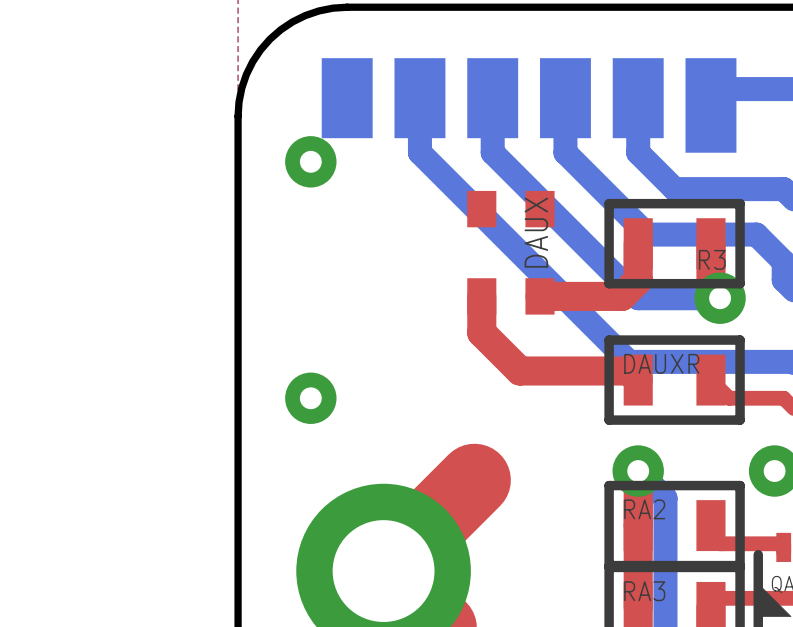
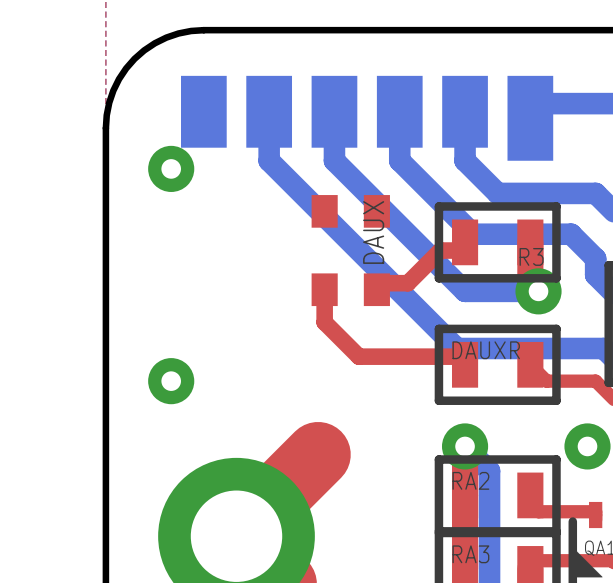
top track: (638, 243) (638, 280) (621, 296) (539, 296) -> (465, 242) (456, 250) (440, 250) (407, 283) (383, 283) (376, 289)
top track width: thick (481, 296) (481, 332) (519, 370) (629, 370) (638, 380) -> thin (324, 289) (324, 322) (358, 356) (456, 356) (465, 364)

